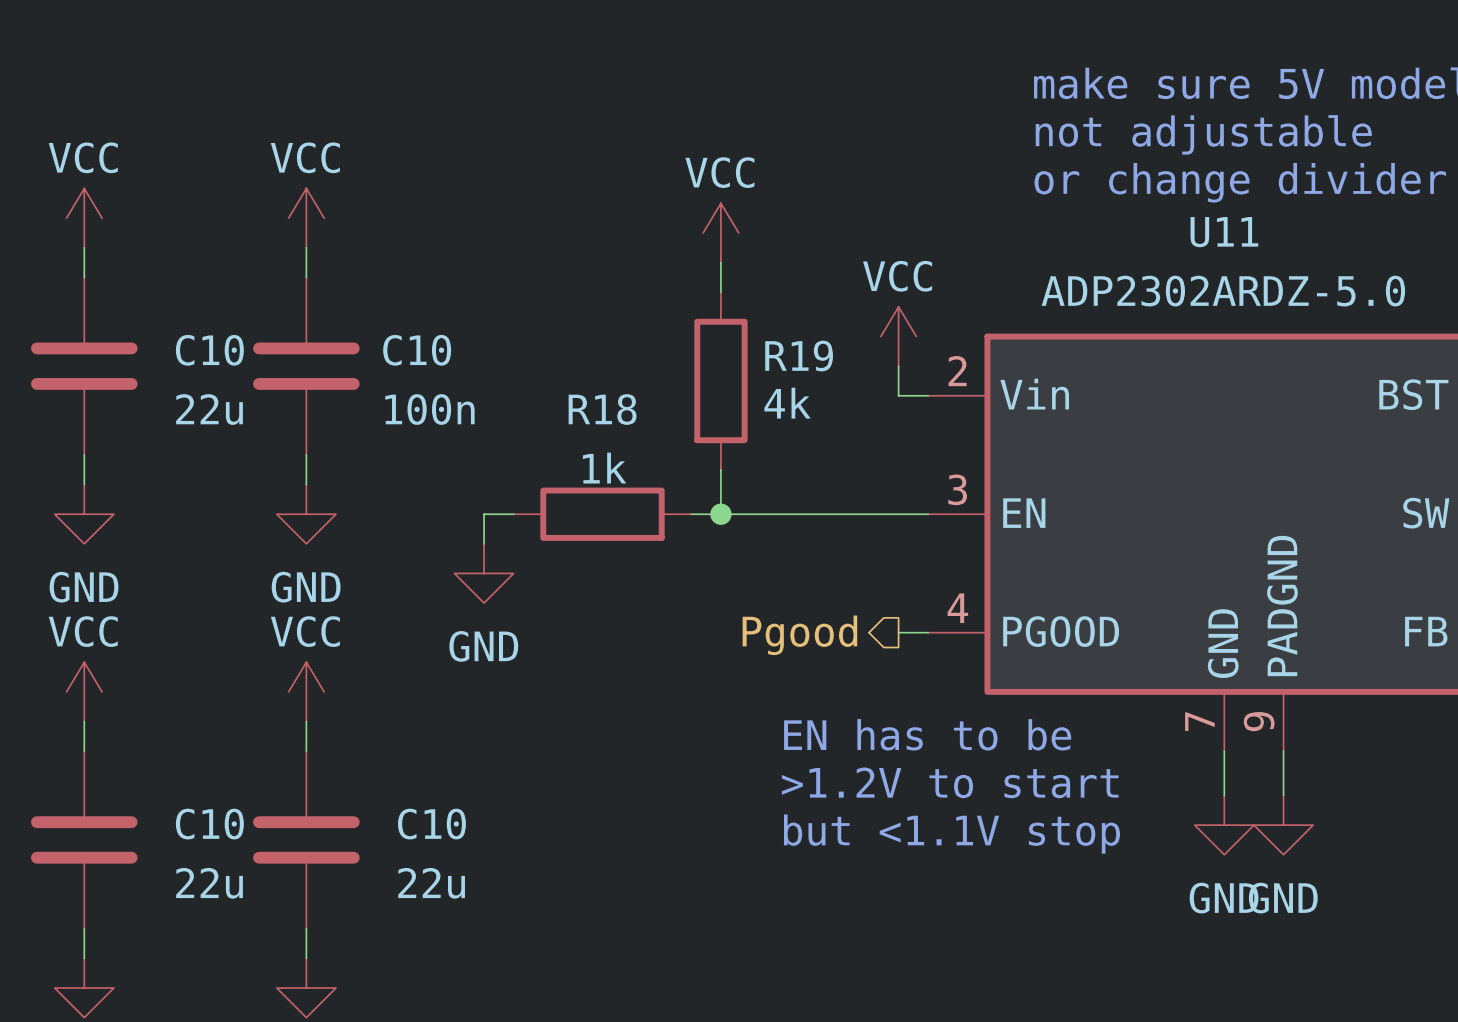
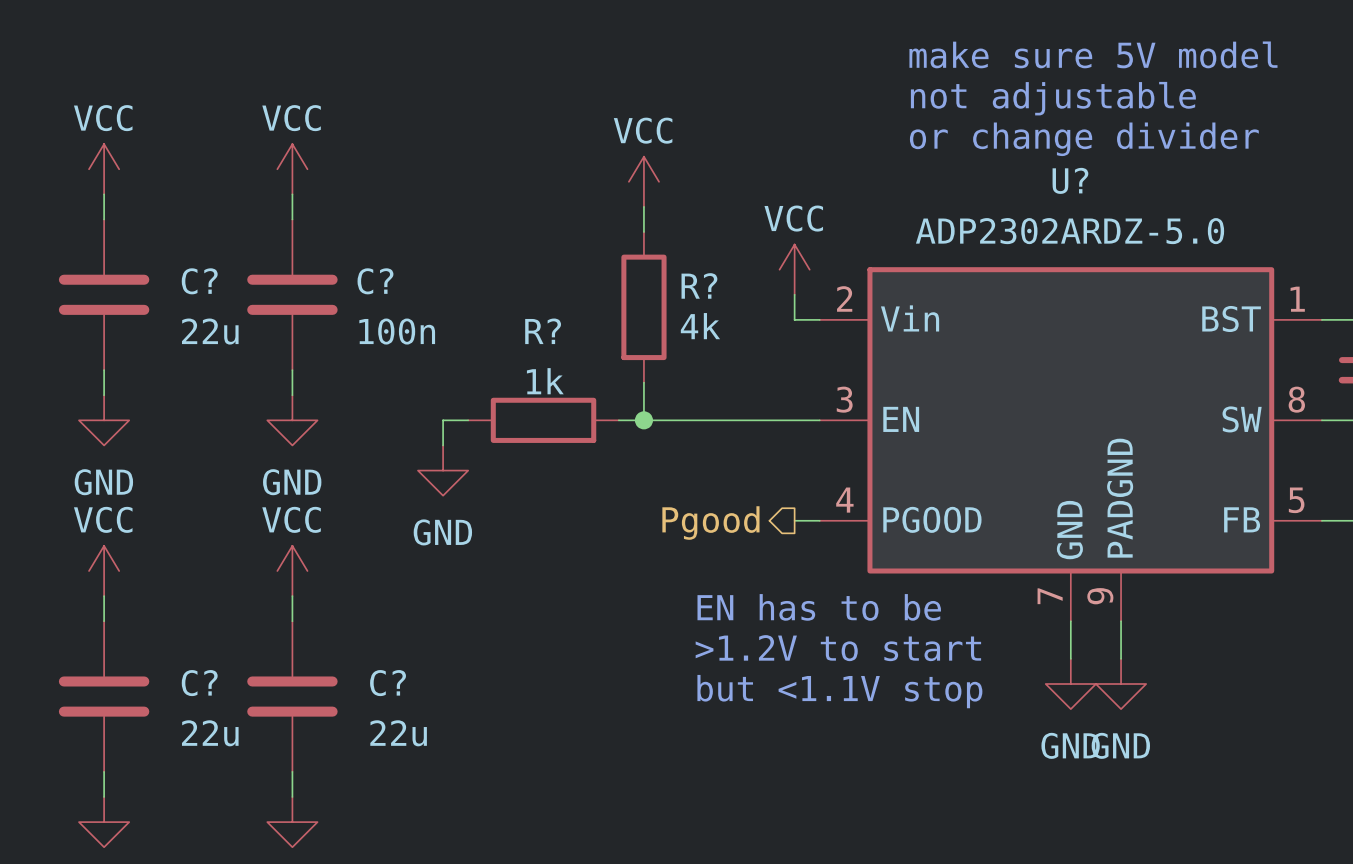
U11 name: U11 (1224, 232) -> U? (1070, 180)
C10 name: C10 (209, 350) -> C? (199, 281)
C10 name: C10 (417, 350) -> C? (375, 281)
R19 name: R19 (799, 356) -> R? (699, 285)
R18 name: R18 (602, 409) -> R? (543, 331)
C10 name: C10 (209, 824) -> C? (199, 683)
C10 name: C10 (431, 824) -> C? (388, 683)

